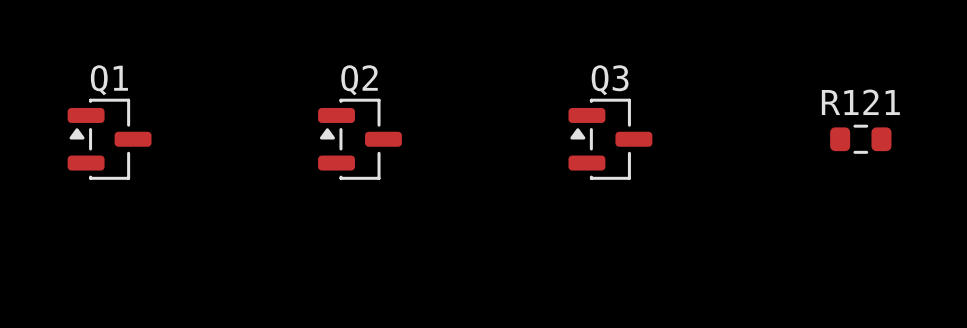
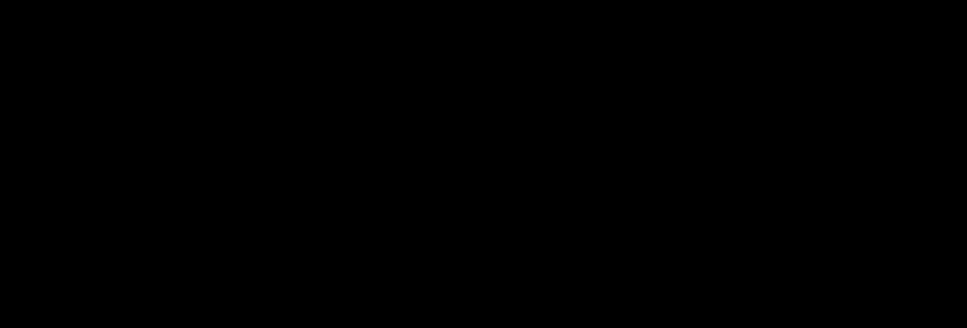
Q1: (109, 139) -> none
Q2: (359, 139) -> none
Q3: (610, 139) -> none
R121: (860, 139) -> none

